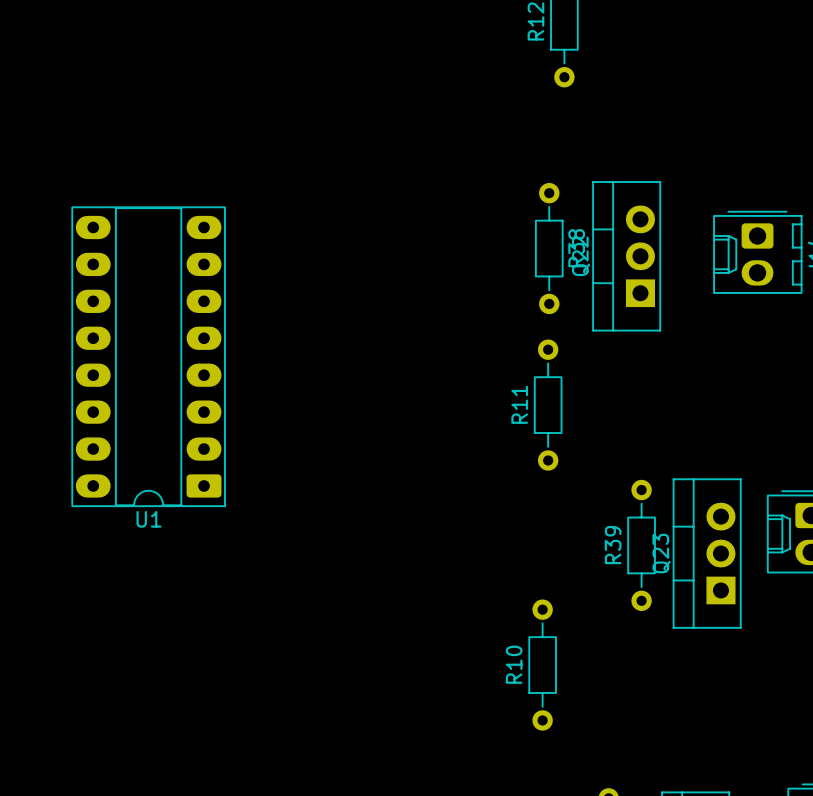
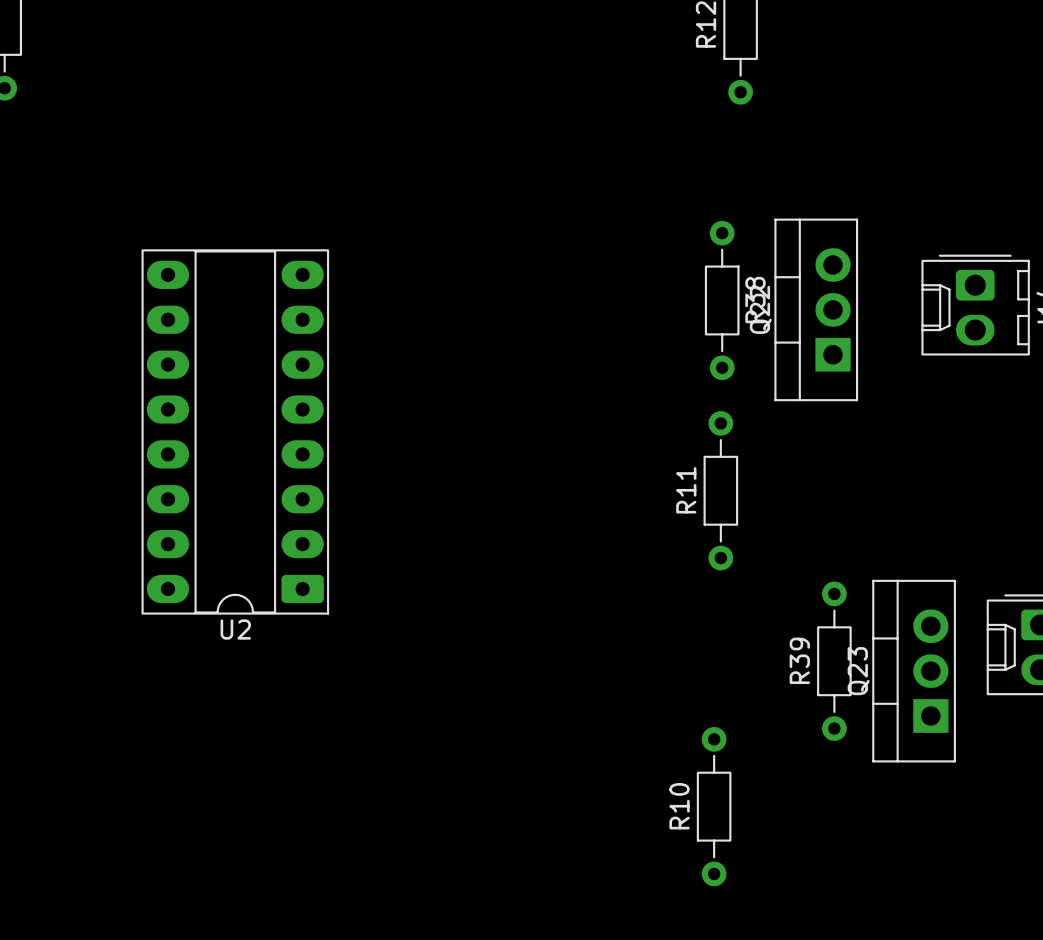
U1 name: U1 (148, 519) -> U2 (235, 629)

